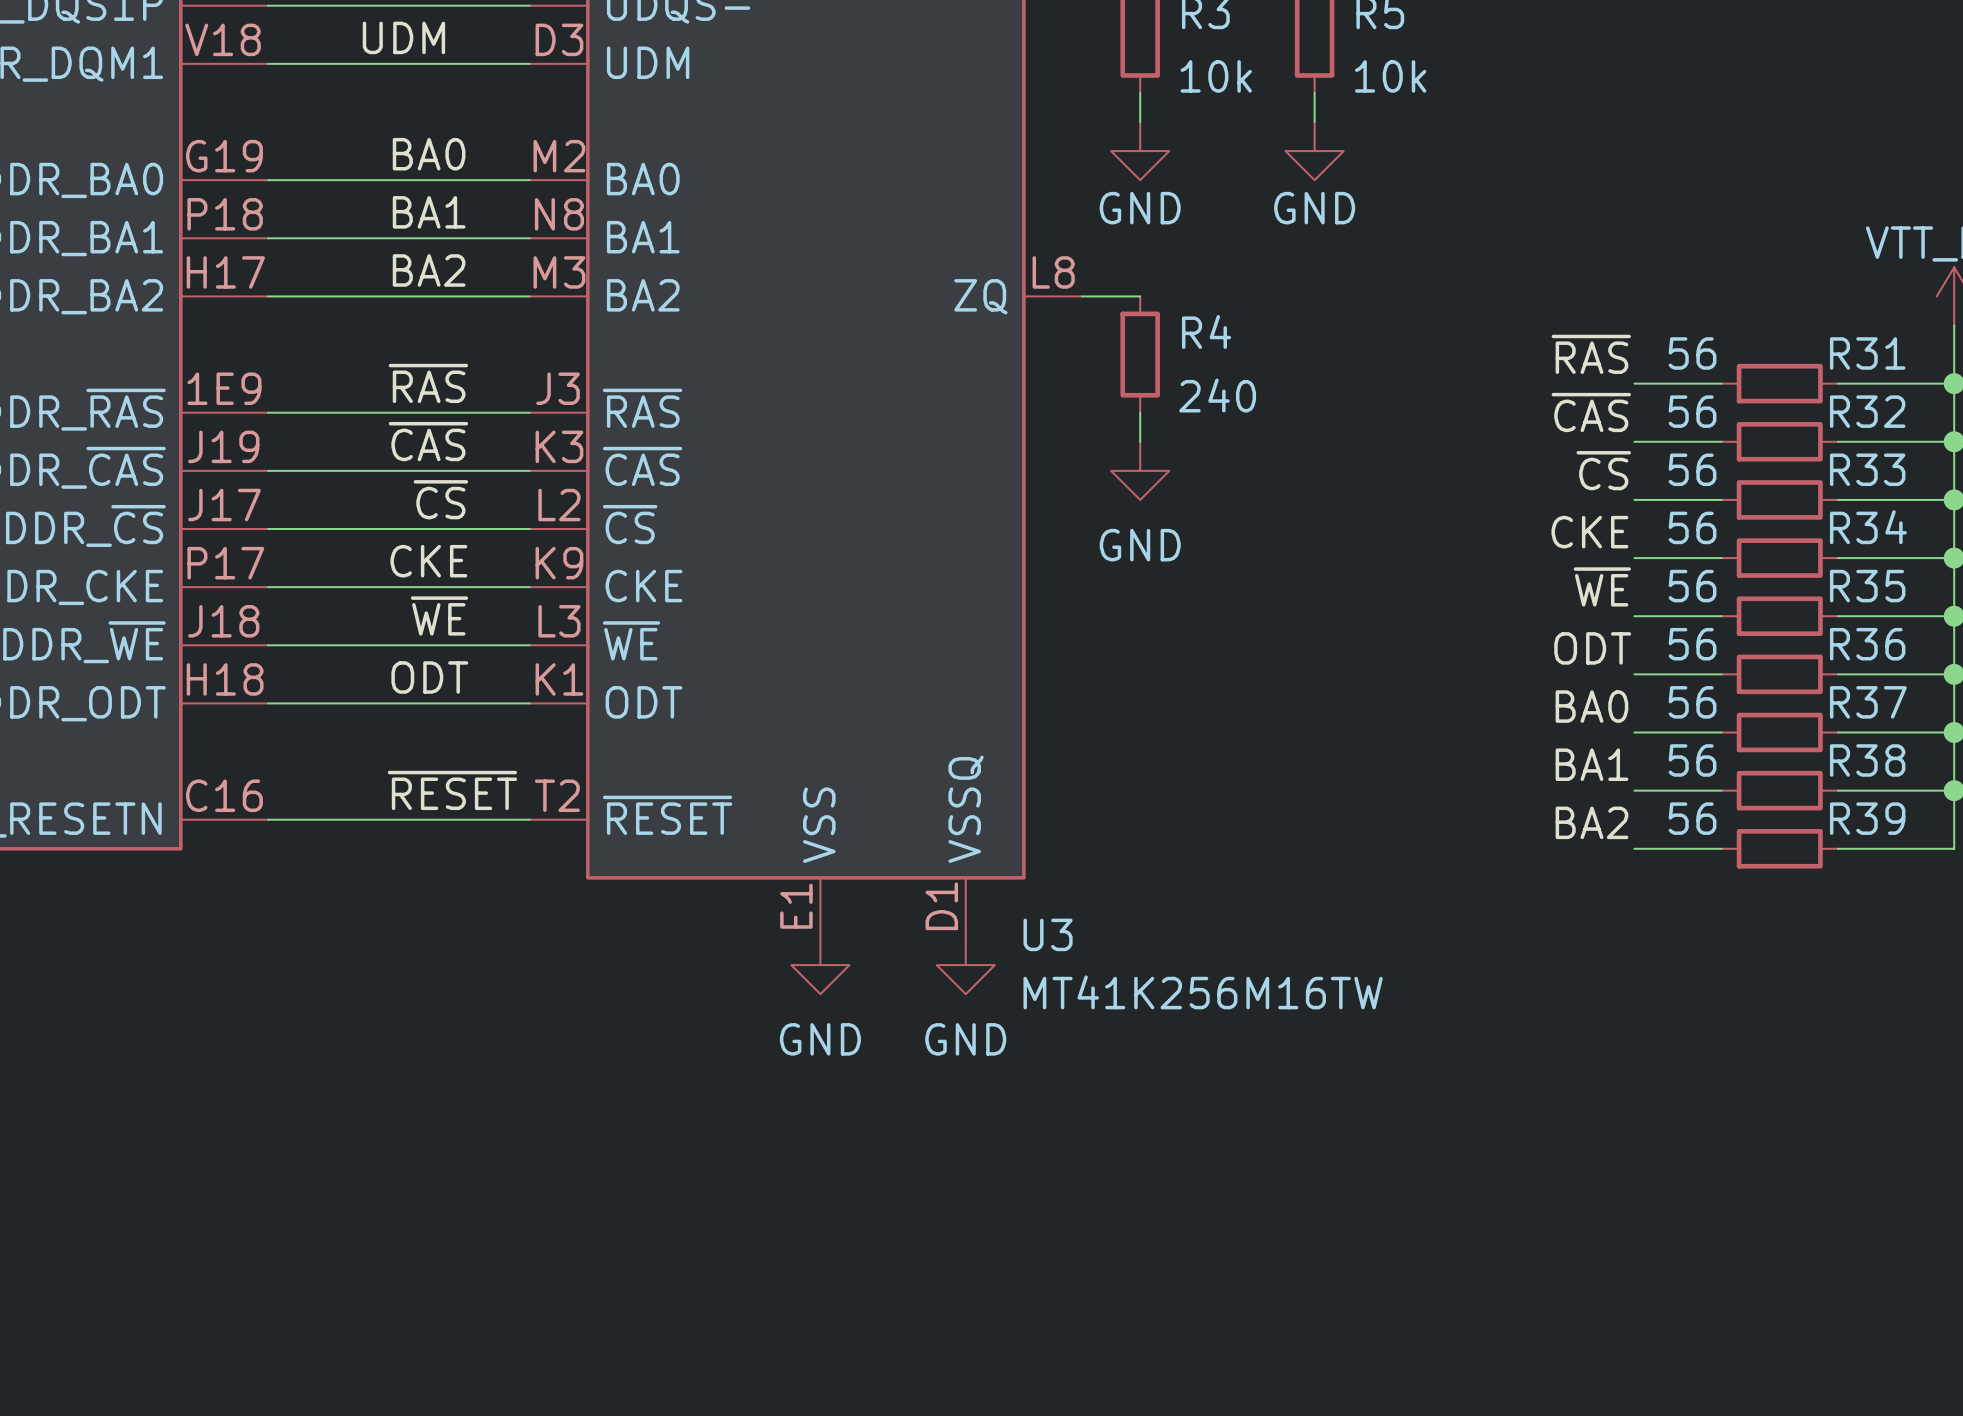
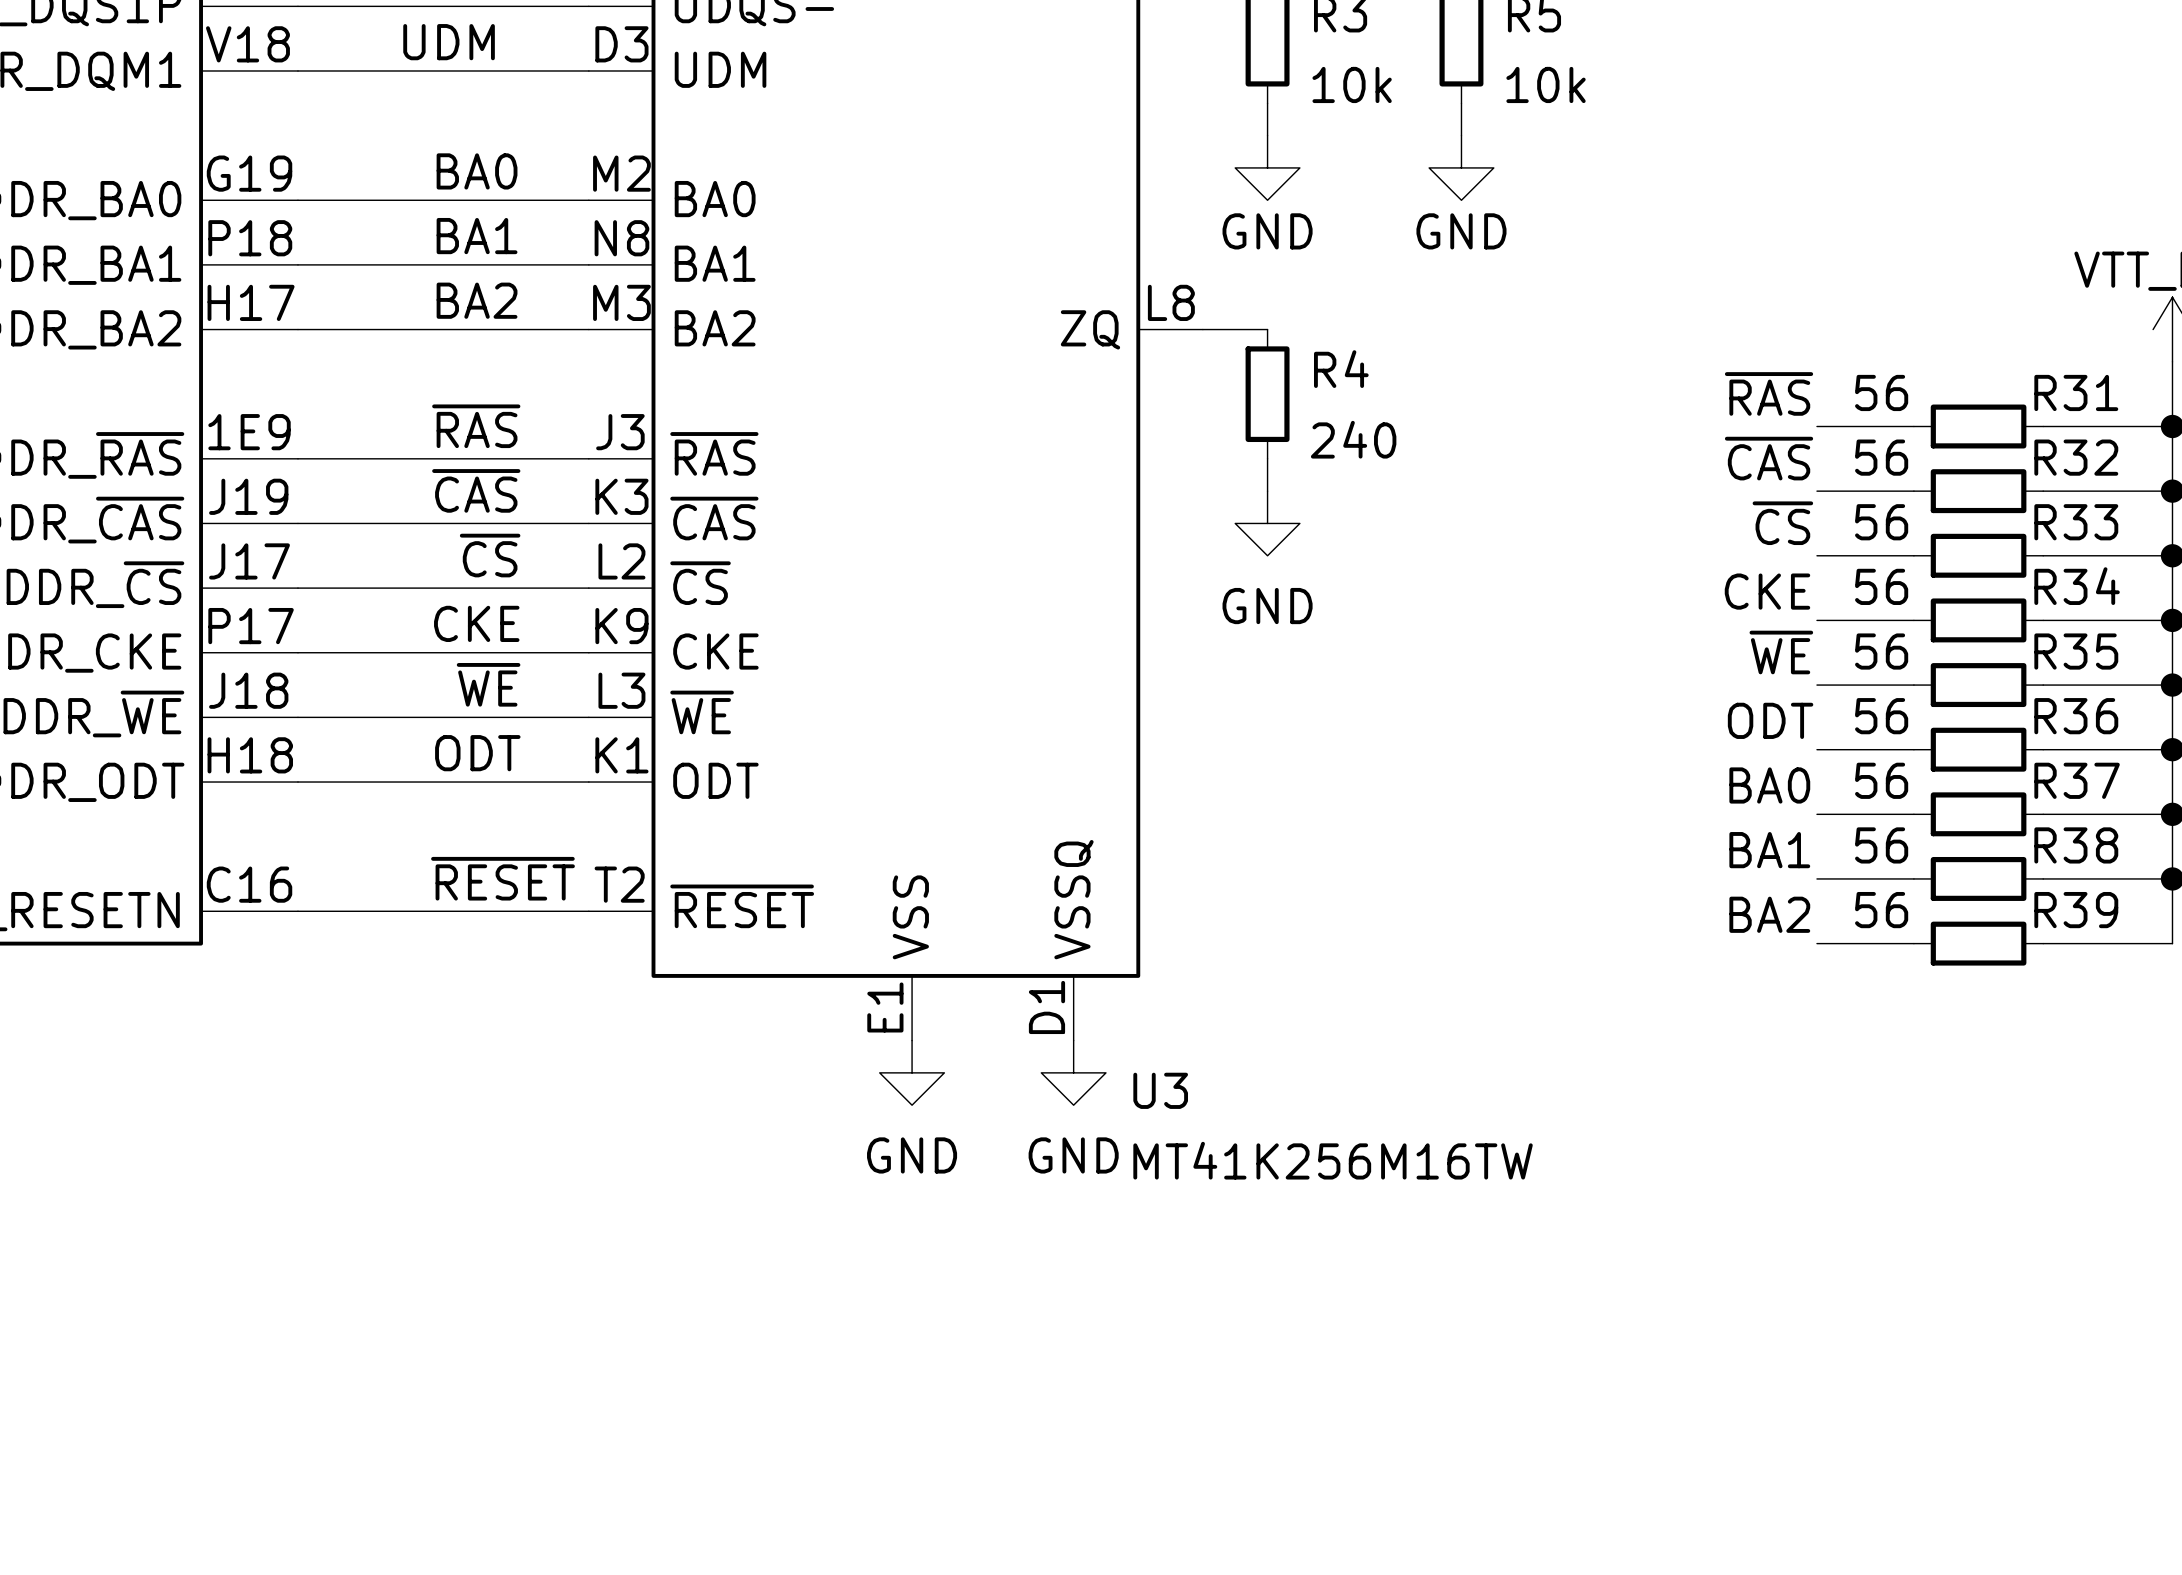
U3 name position: U3 (1048, 934) -> U3 (1160, 1090)
U3 value position: MT41K256M16TW (1203, 992) -> MT41K256M16TW (1333, 1160)

